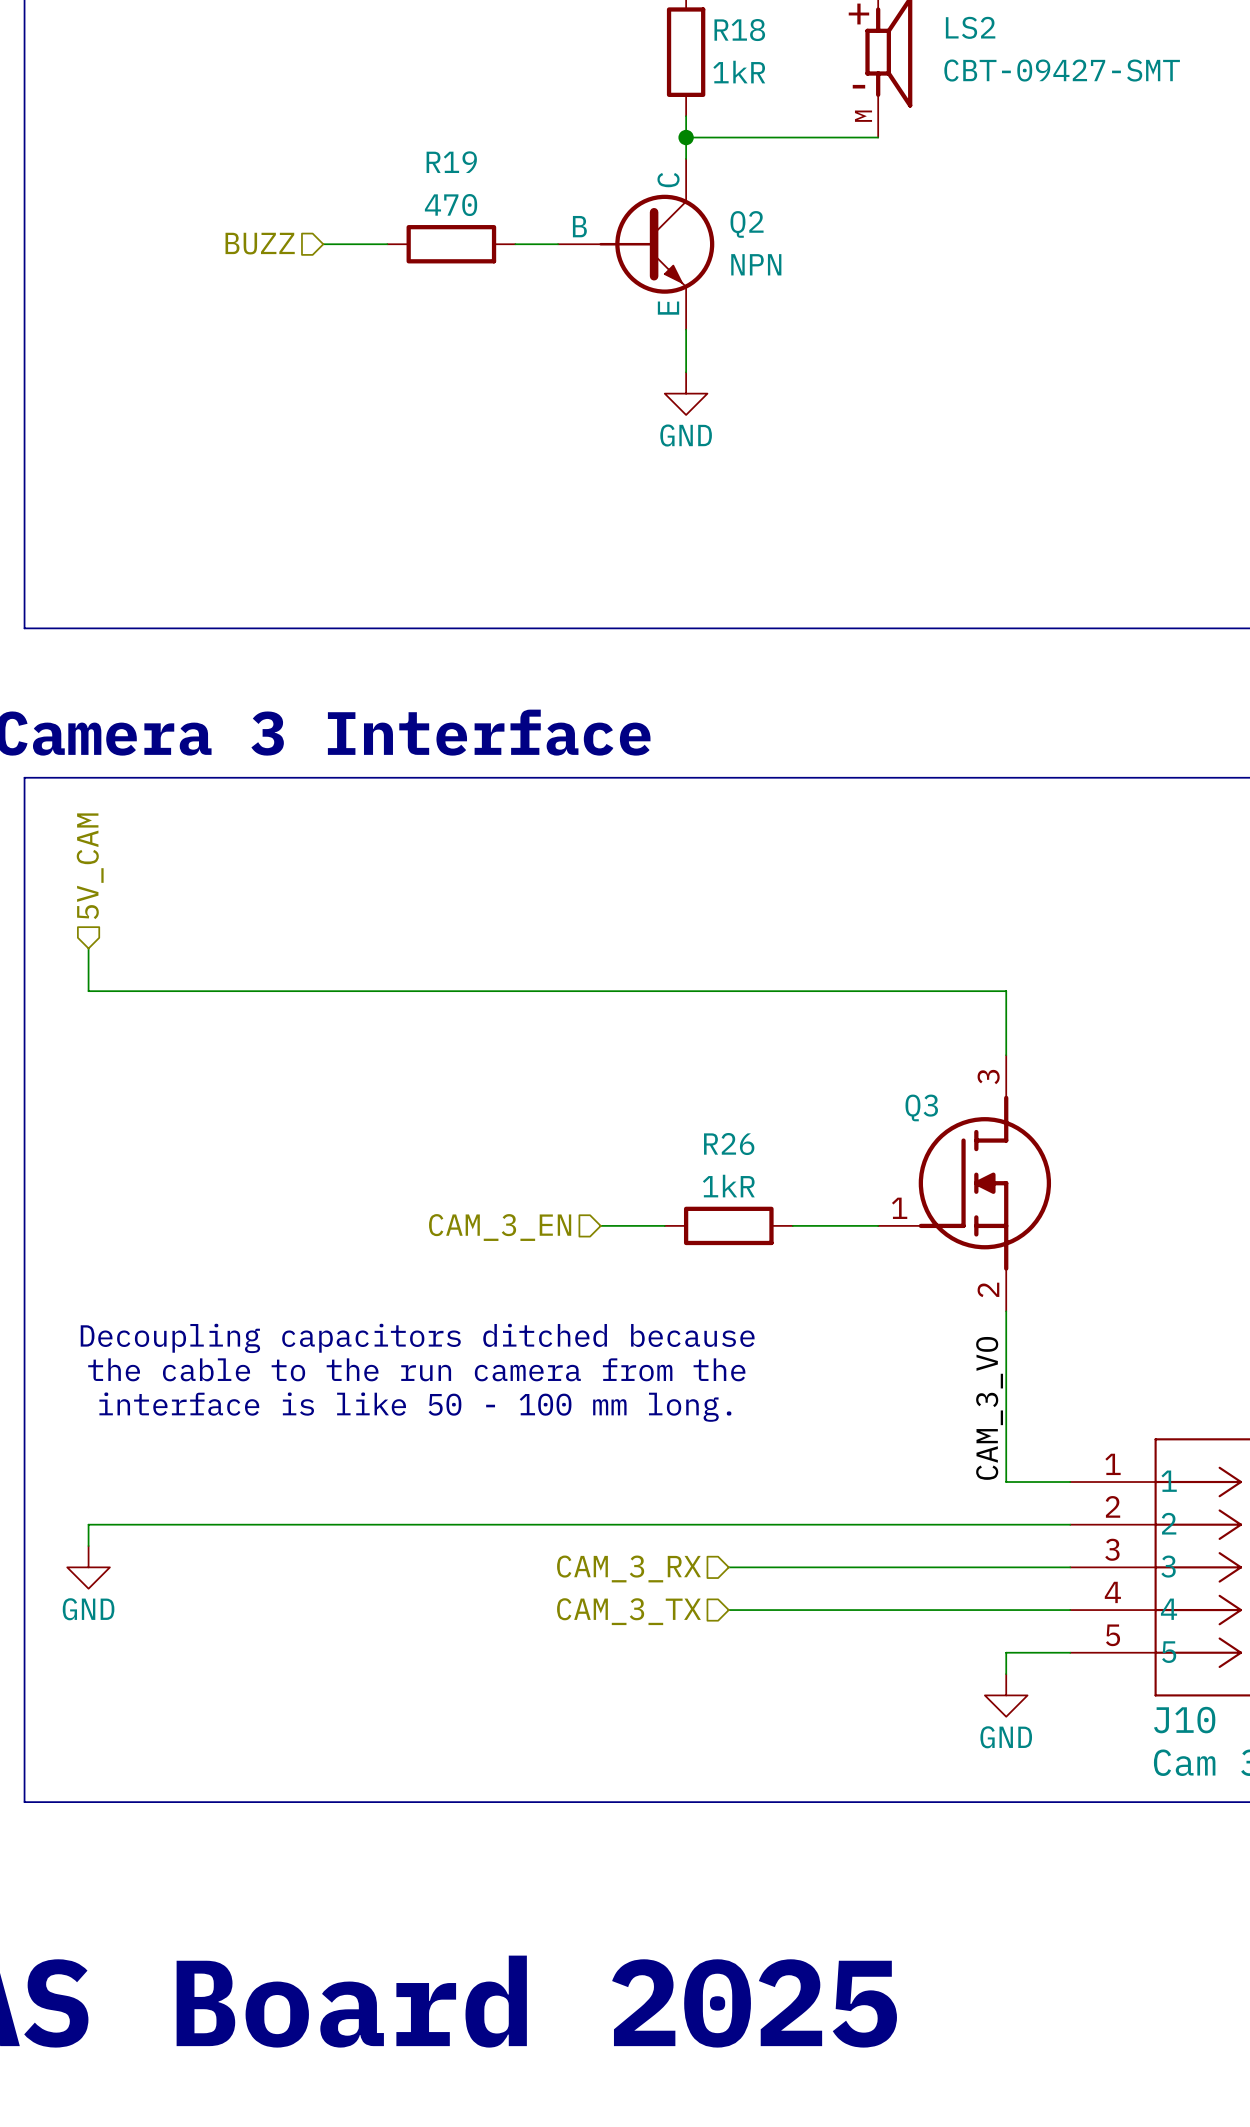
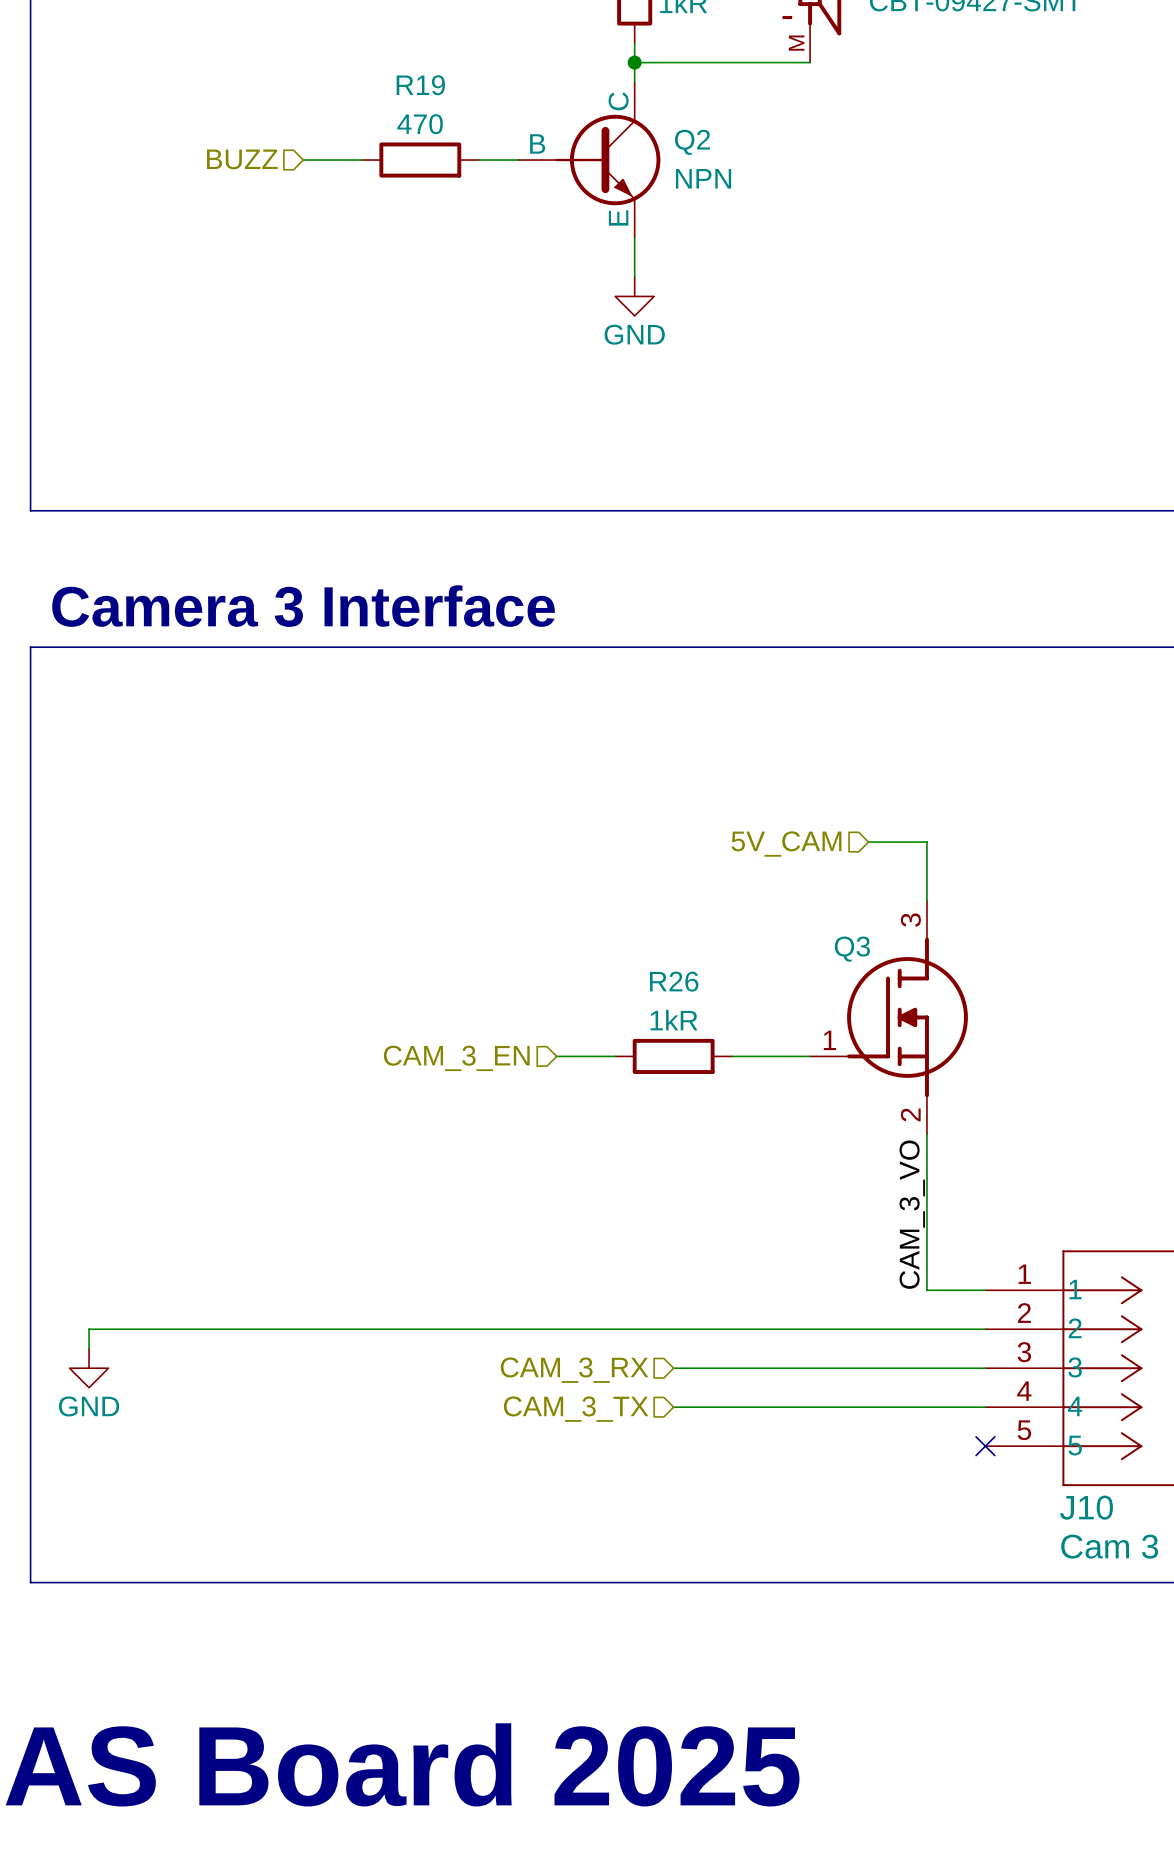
hierarchical label: 5V_CAM (90, 866) -> none
wire: (88, 948) (88, 991) (942, 991) -> none
hierarchical label: none -> 5V_CAM (786, 844)
text: Decoupling capacitors ditched because (417, 1338) -> none
text: the cable to the run camera from the (416, 1369) -> none
text: interface is like 50 - 100 mm long. (415, 1407) -> none
wire: (1070, 1652) (1006, 1652) (1006, 1674) -> none
no-connect mark: none -> (985, 1446)
power symbol: GND (1006, 1695) -> none

